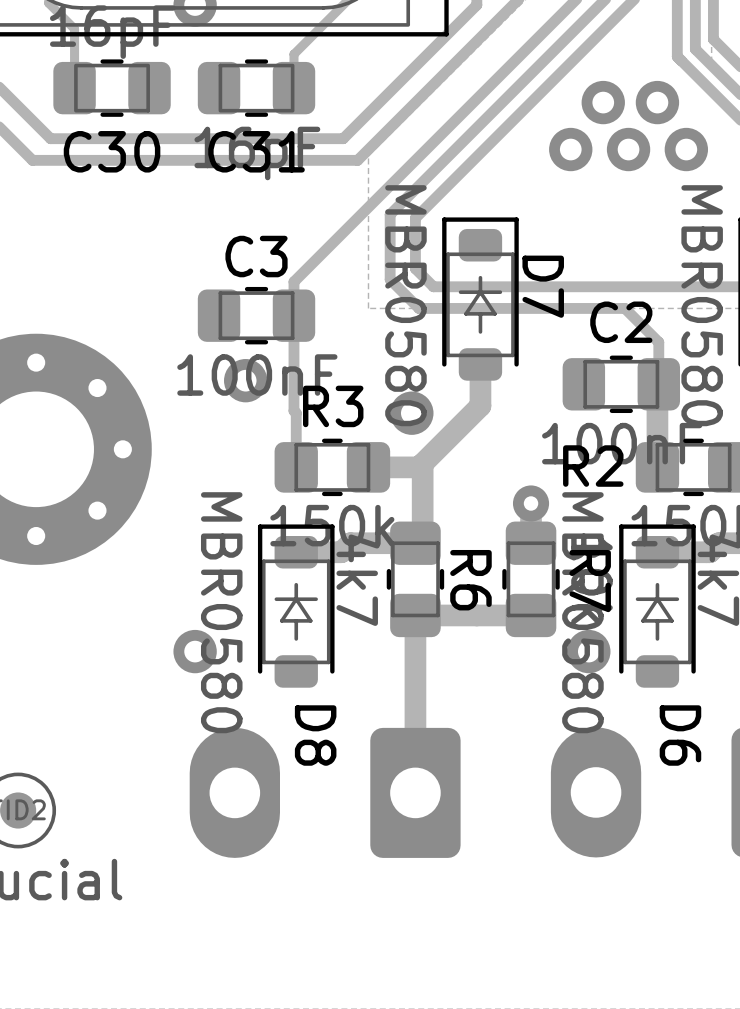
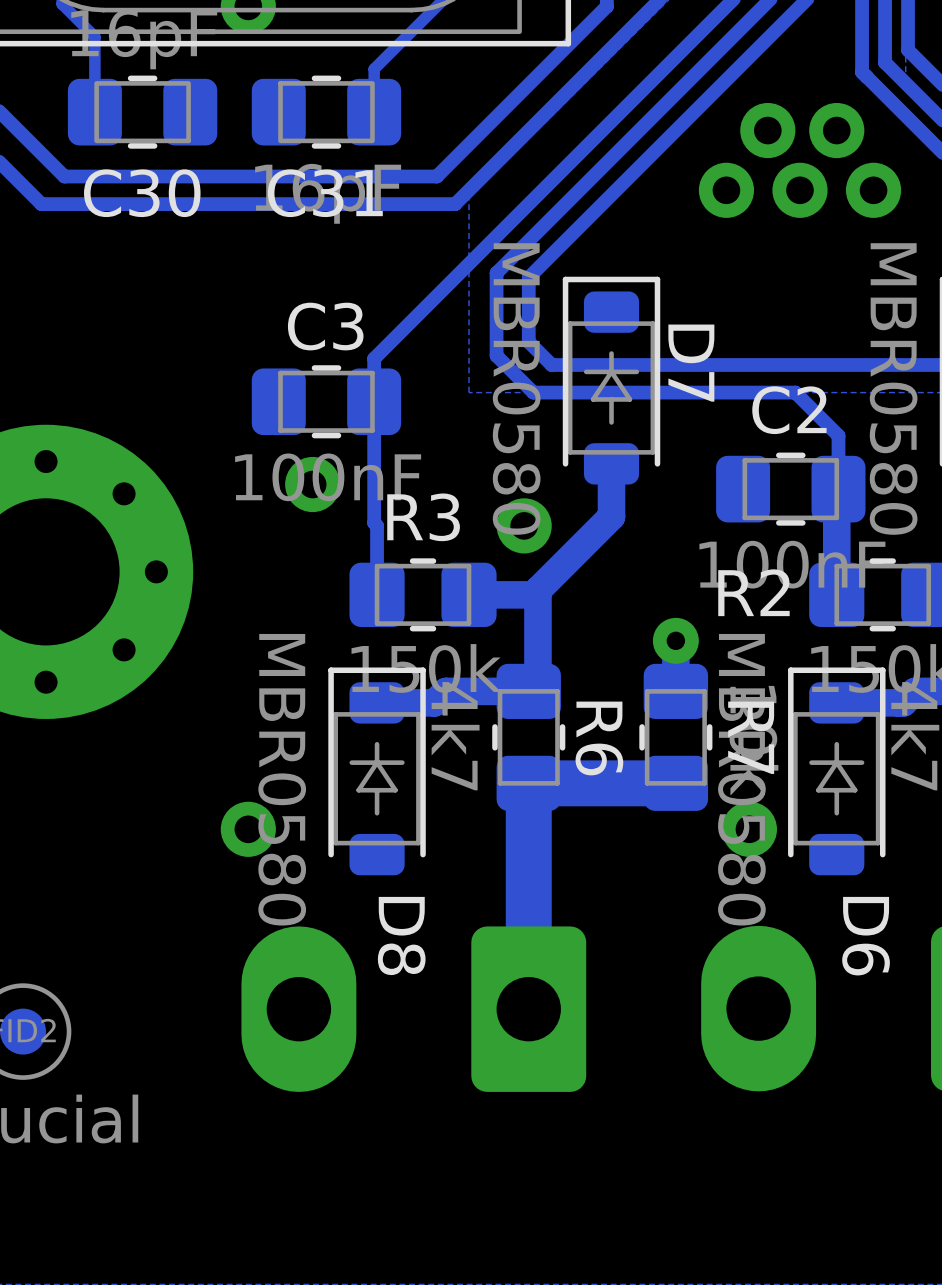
track width: thin (415, 615) (415, 792) -> thick (528, 783) (528, 1009)
track width: thin (531, 615) (422, 615) -> thick (675, 783) (537, 783)

